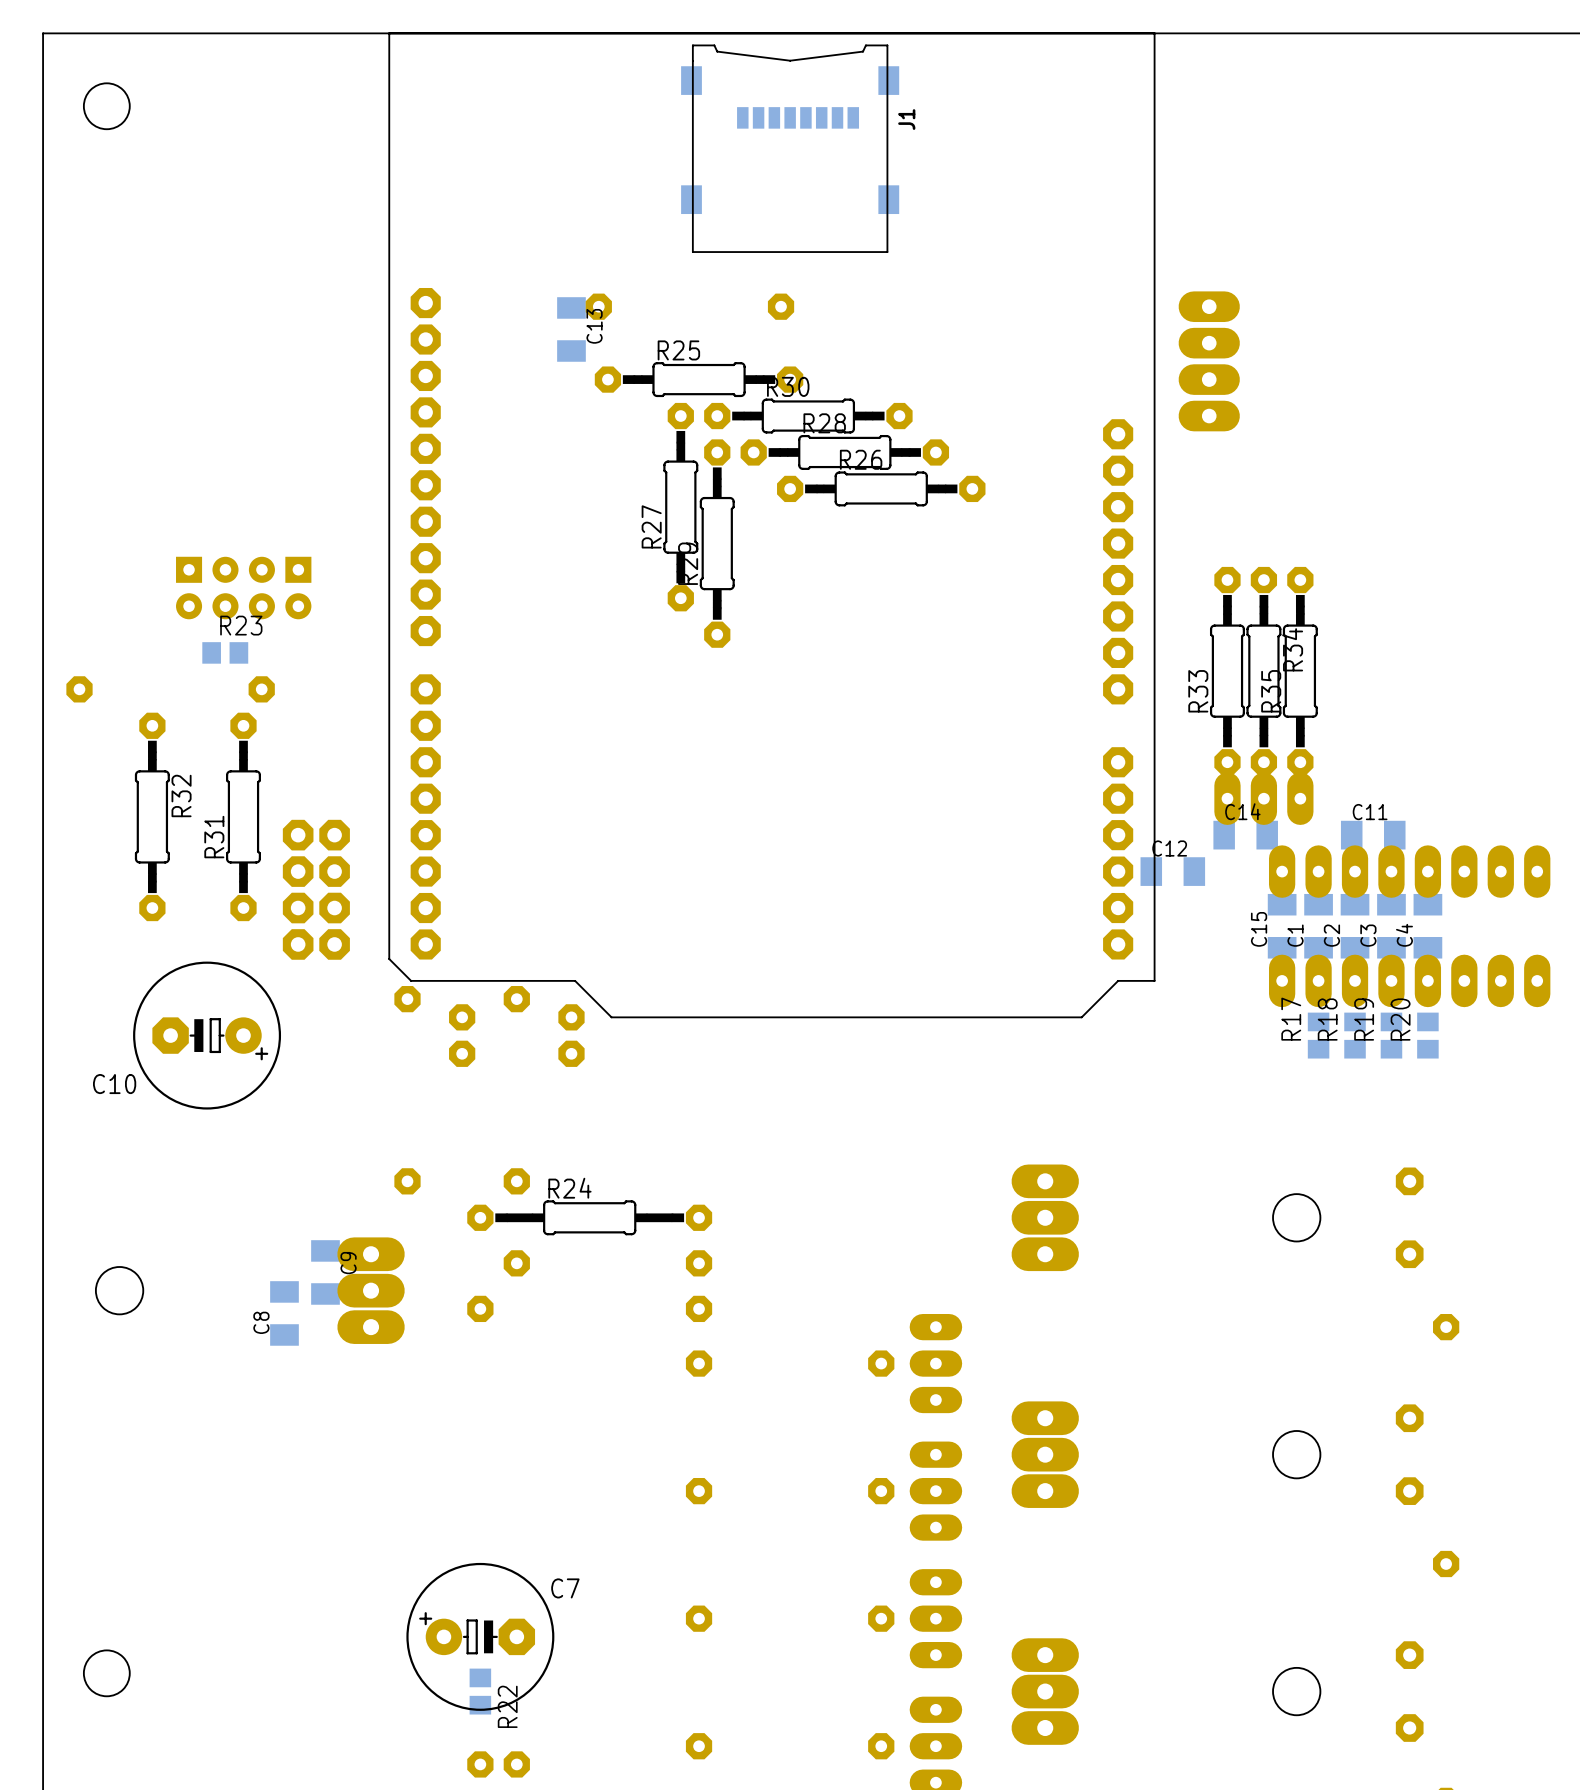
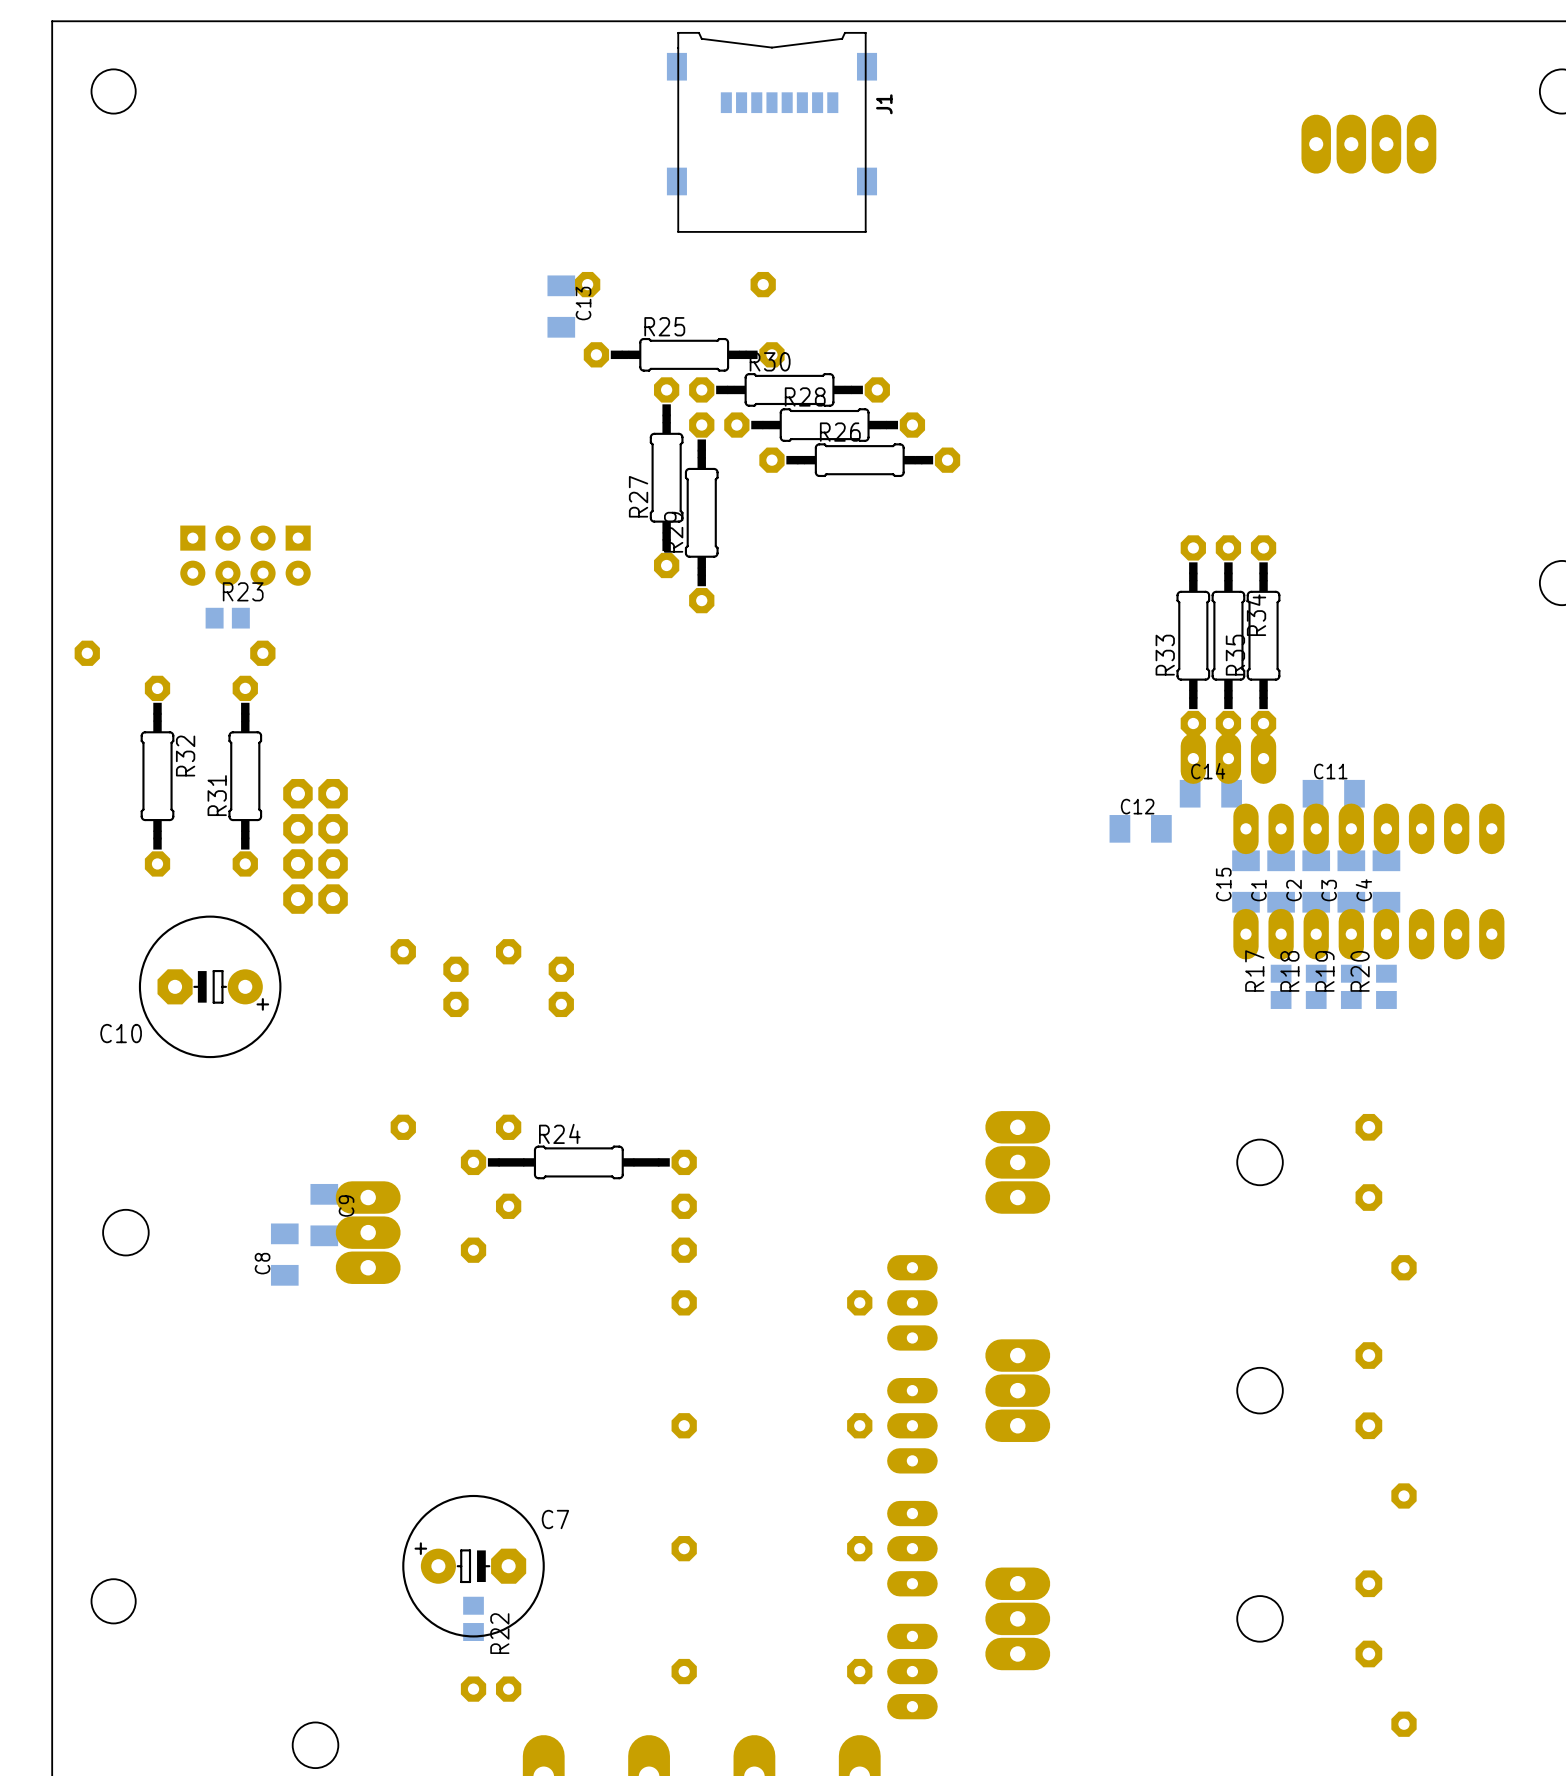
part rotation: 0° (1209, 361) -> 90° clockwise (1368, 144)
part position: (1209, 361) -> (1368, 144)
part: (771, 525) -> none

